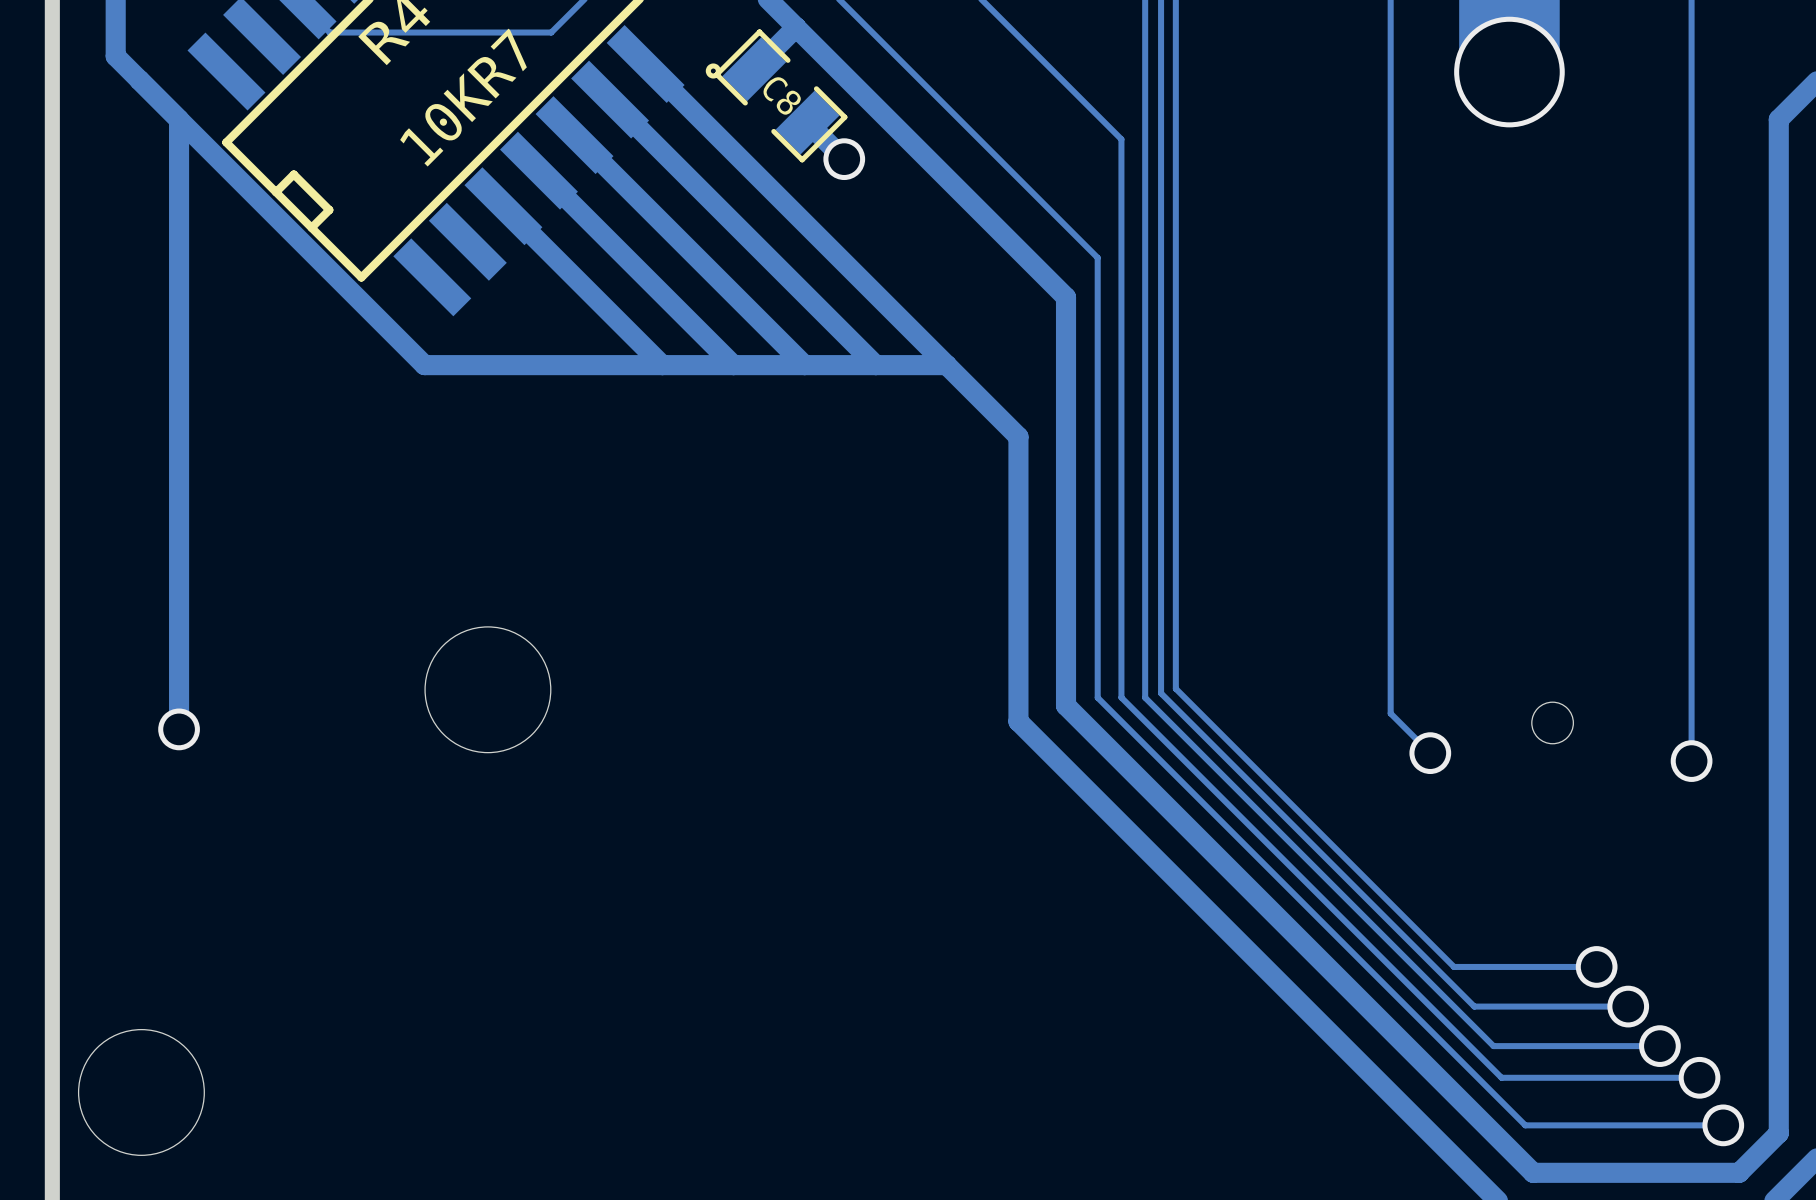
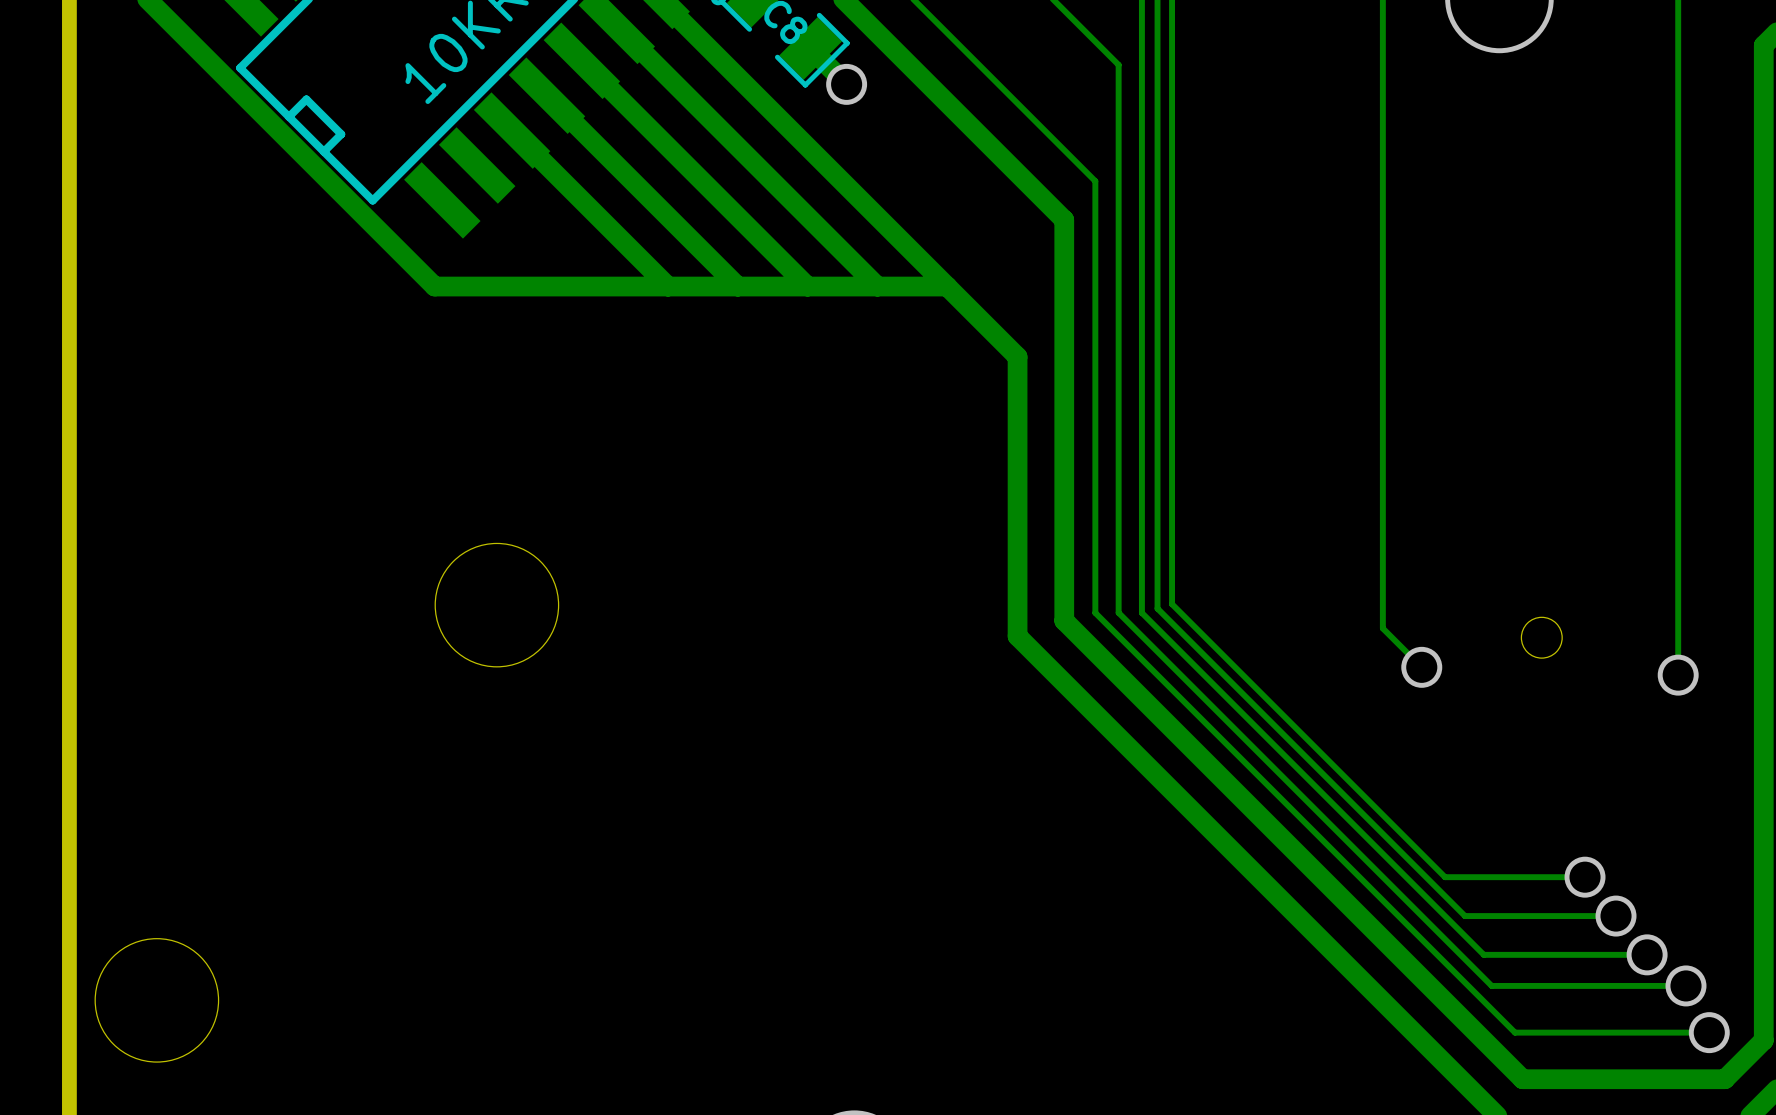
track: (179, 119) (179, 729) -> none
via: (179, 729) -> none

